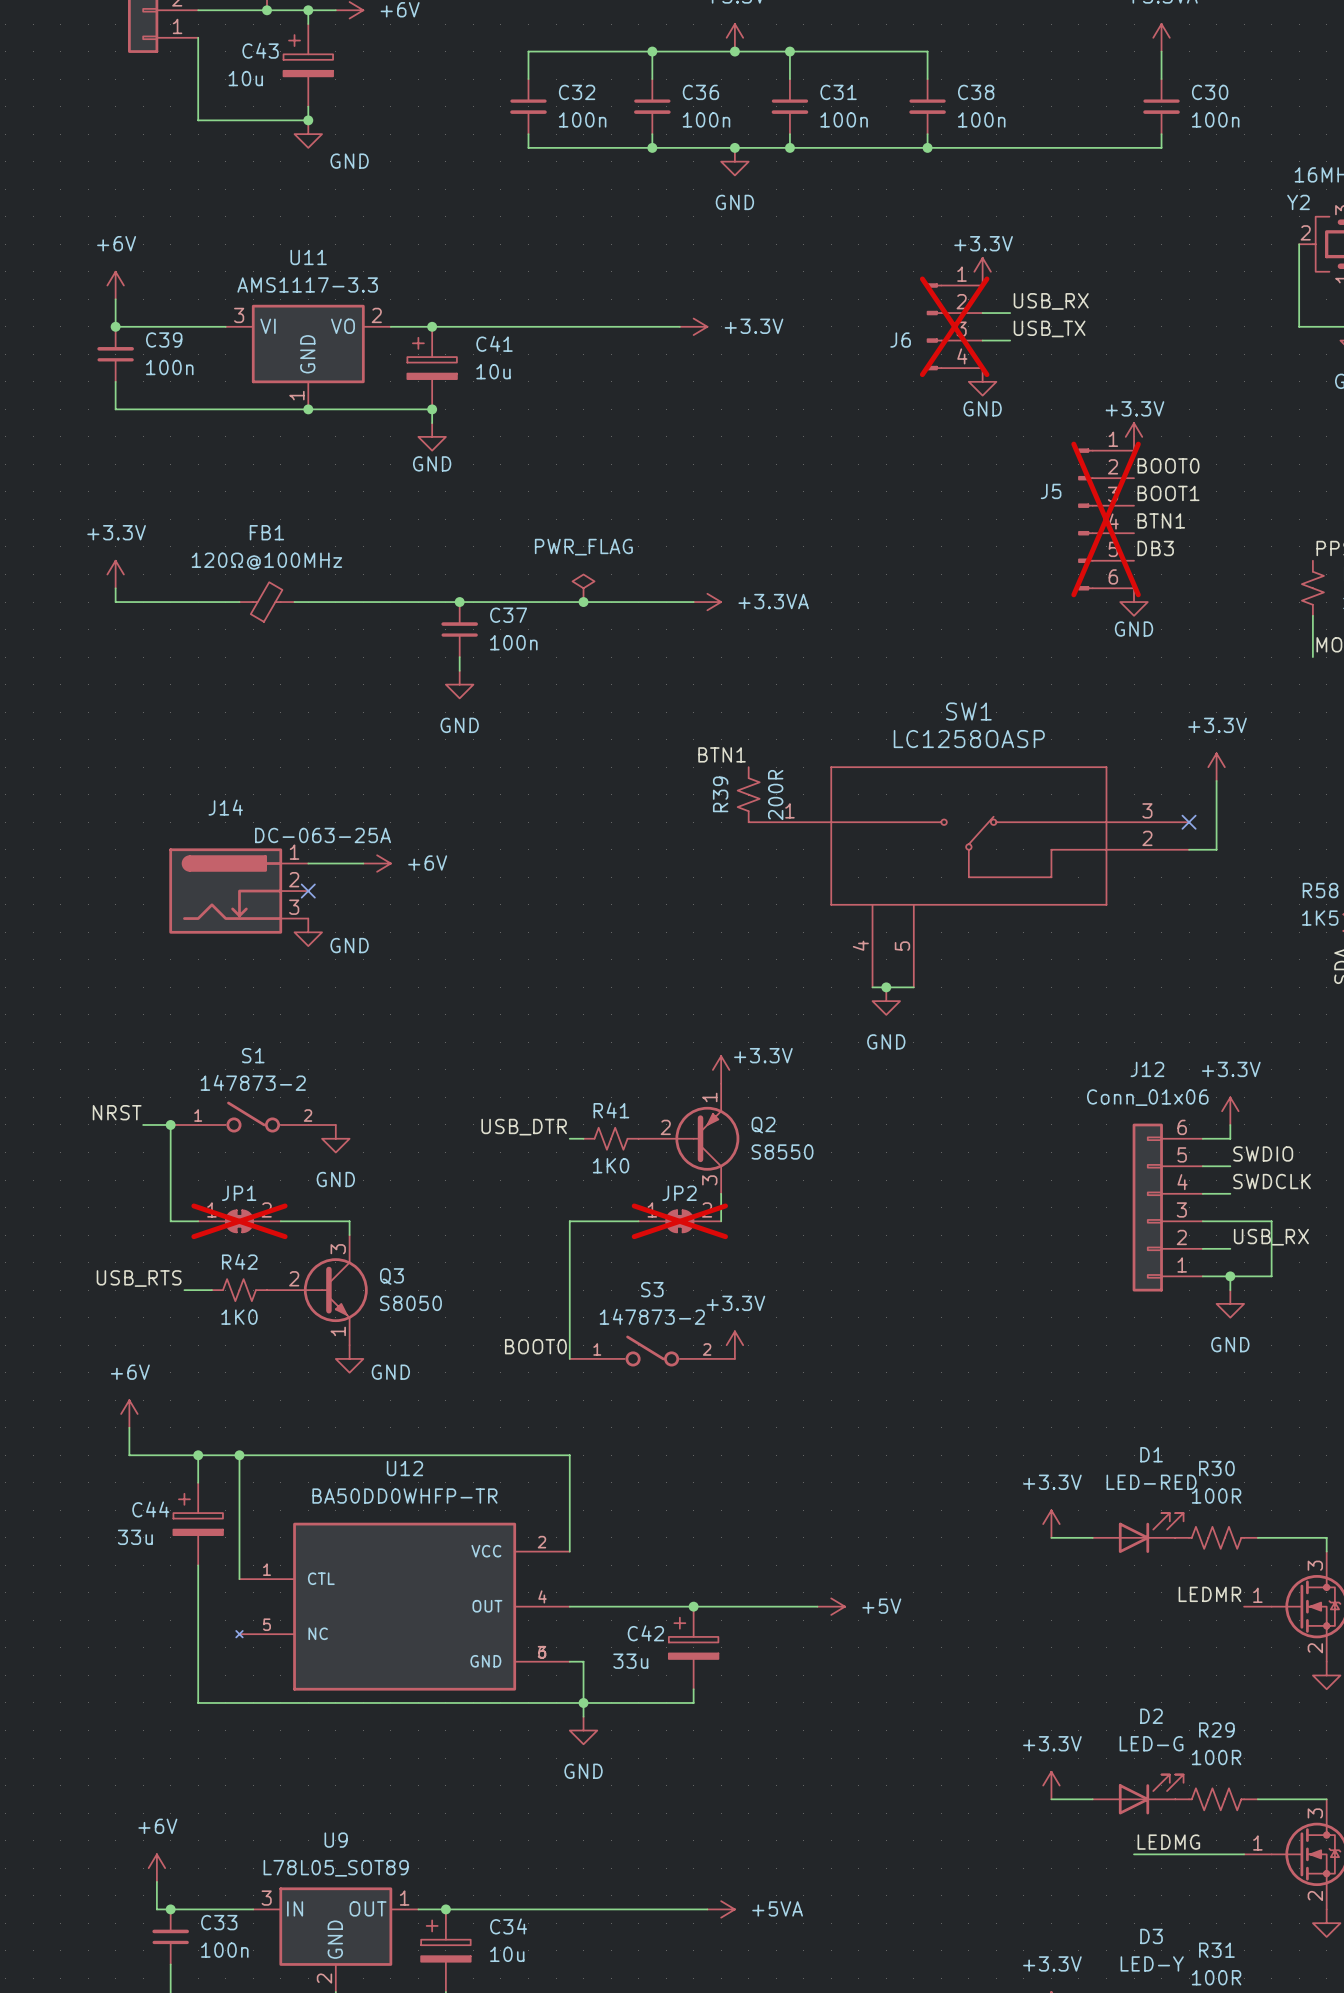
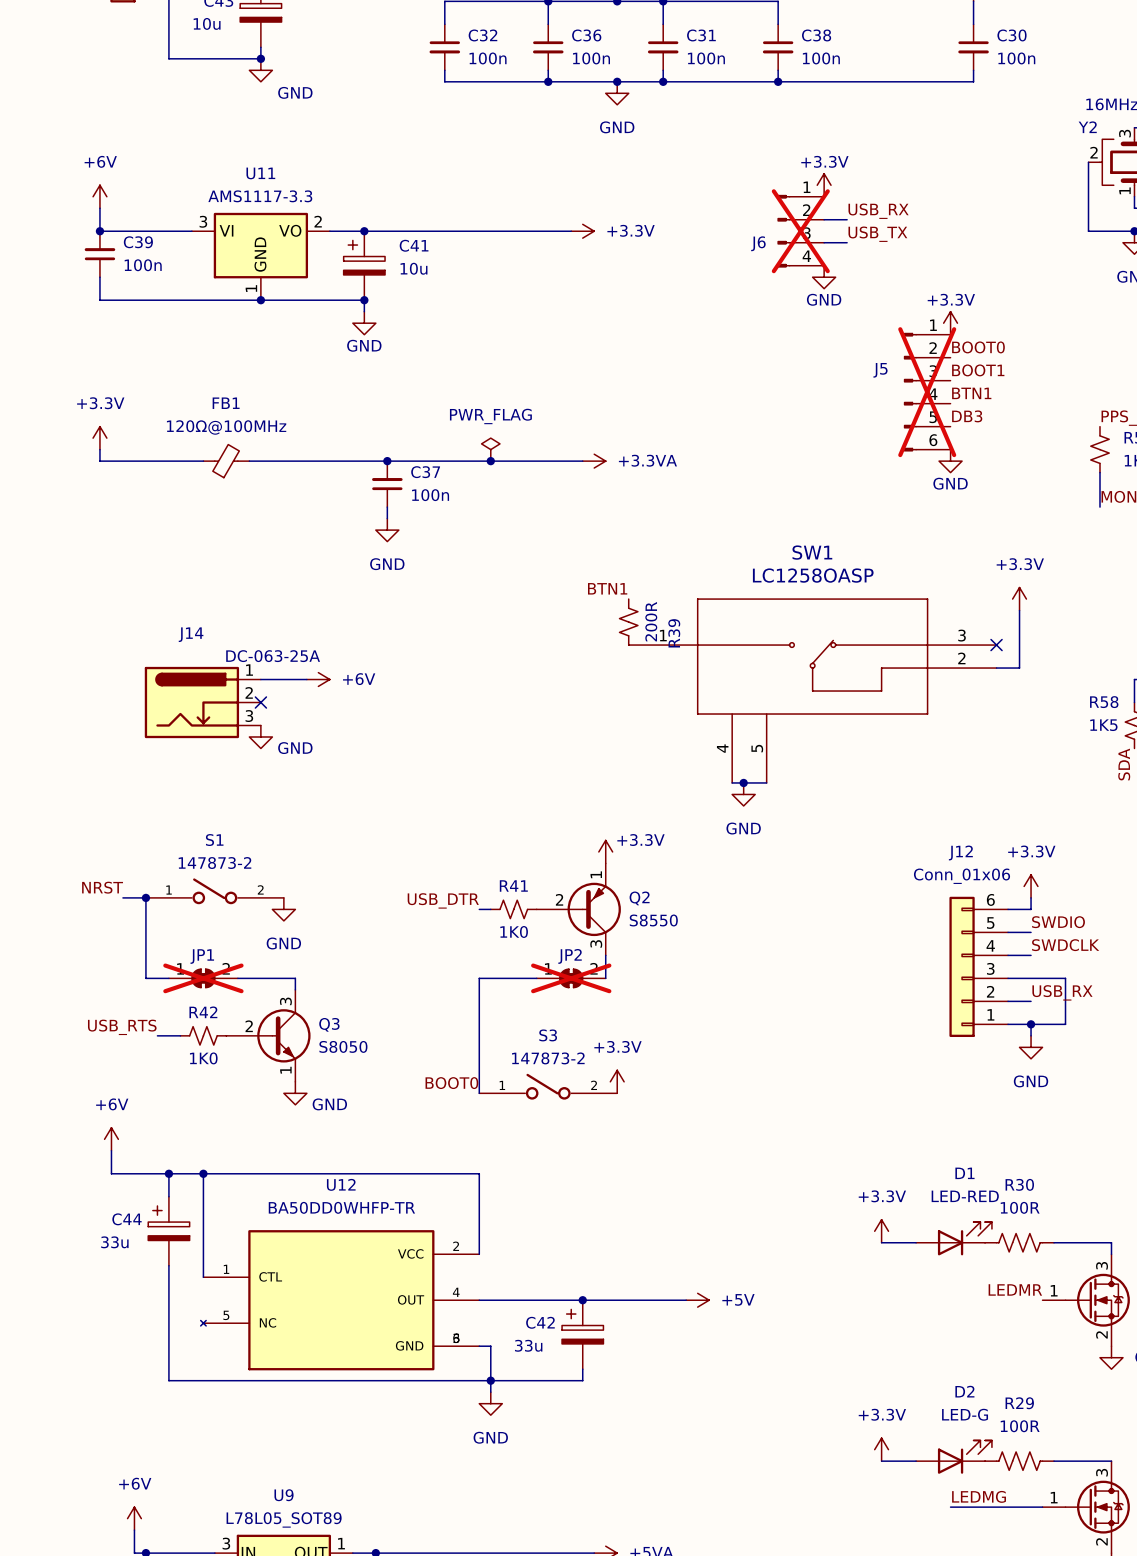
R39 name position: R39 (720, 794) -> R39 (674, 633)

